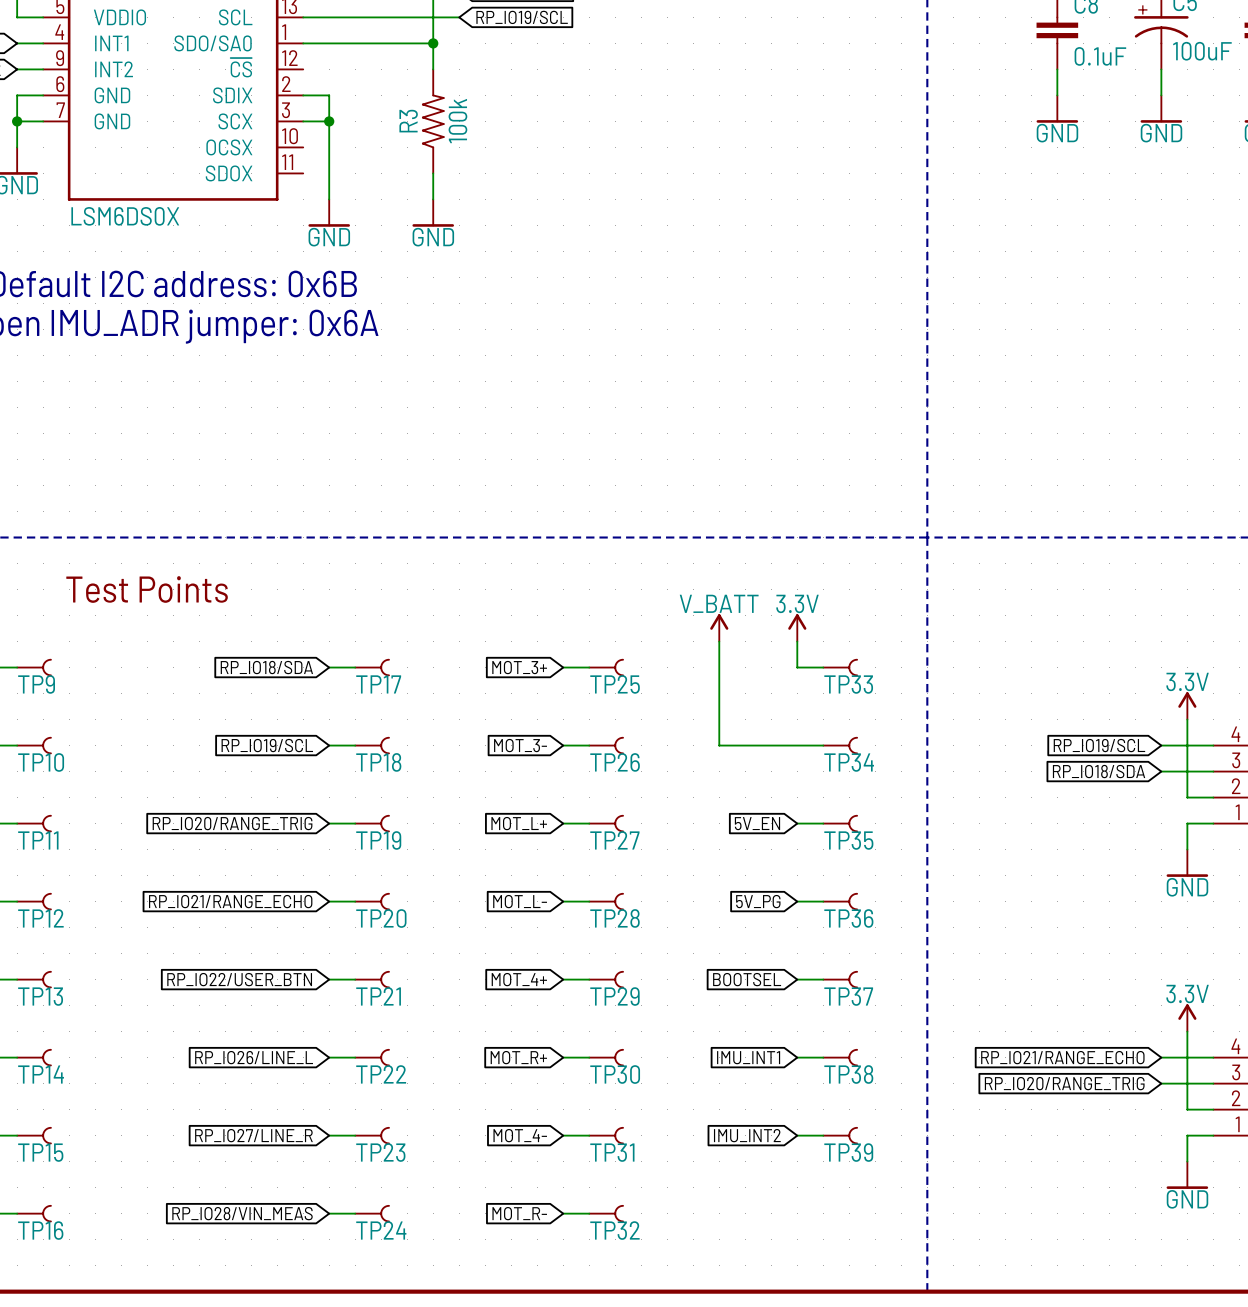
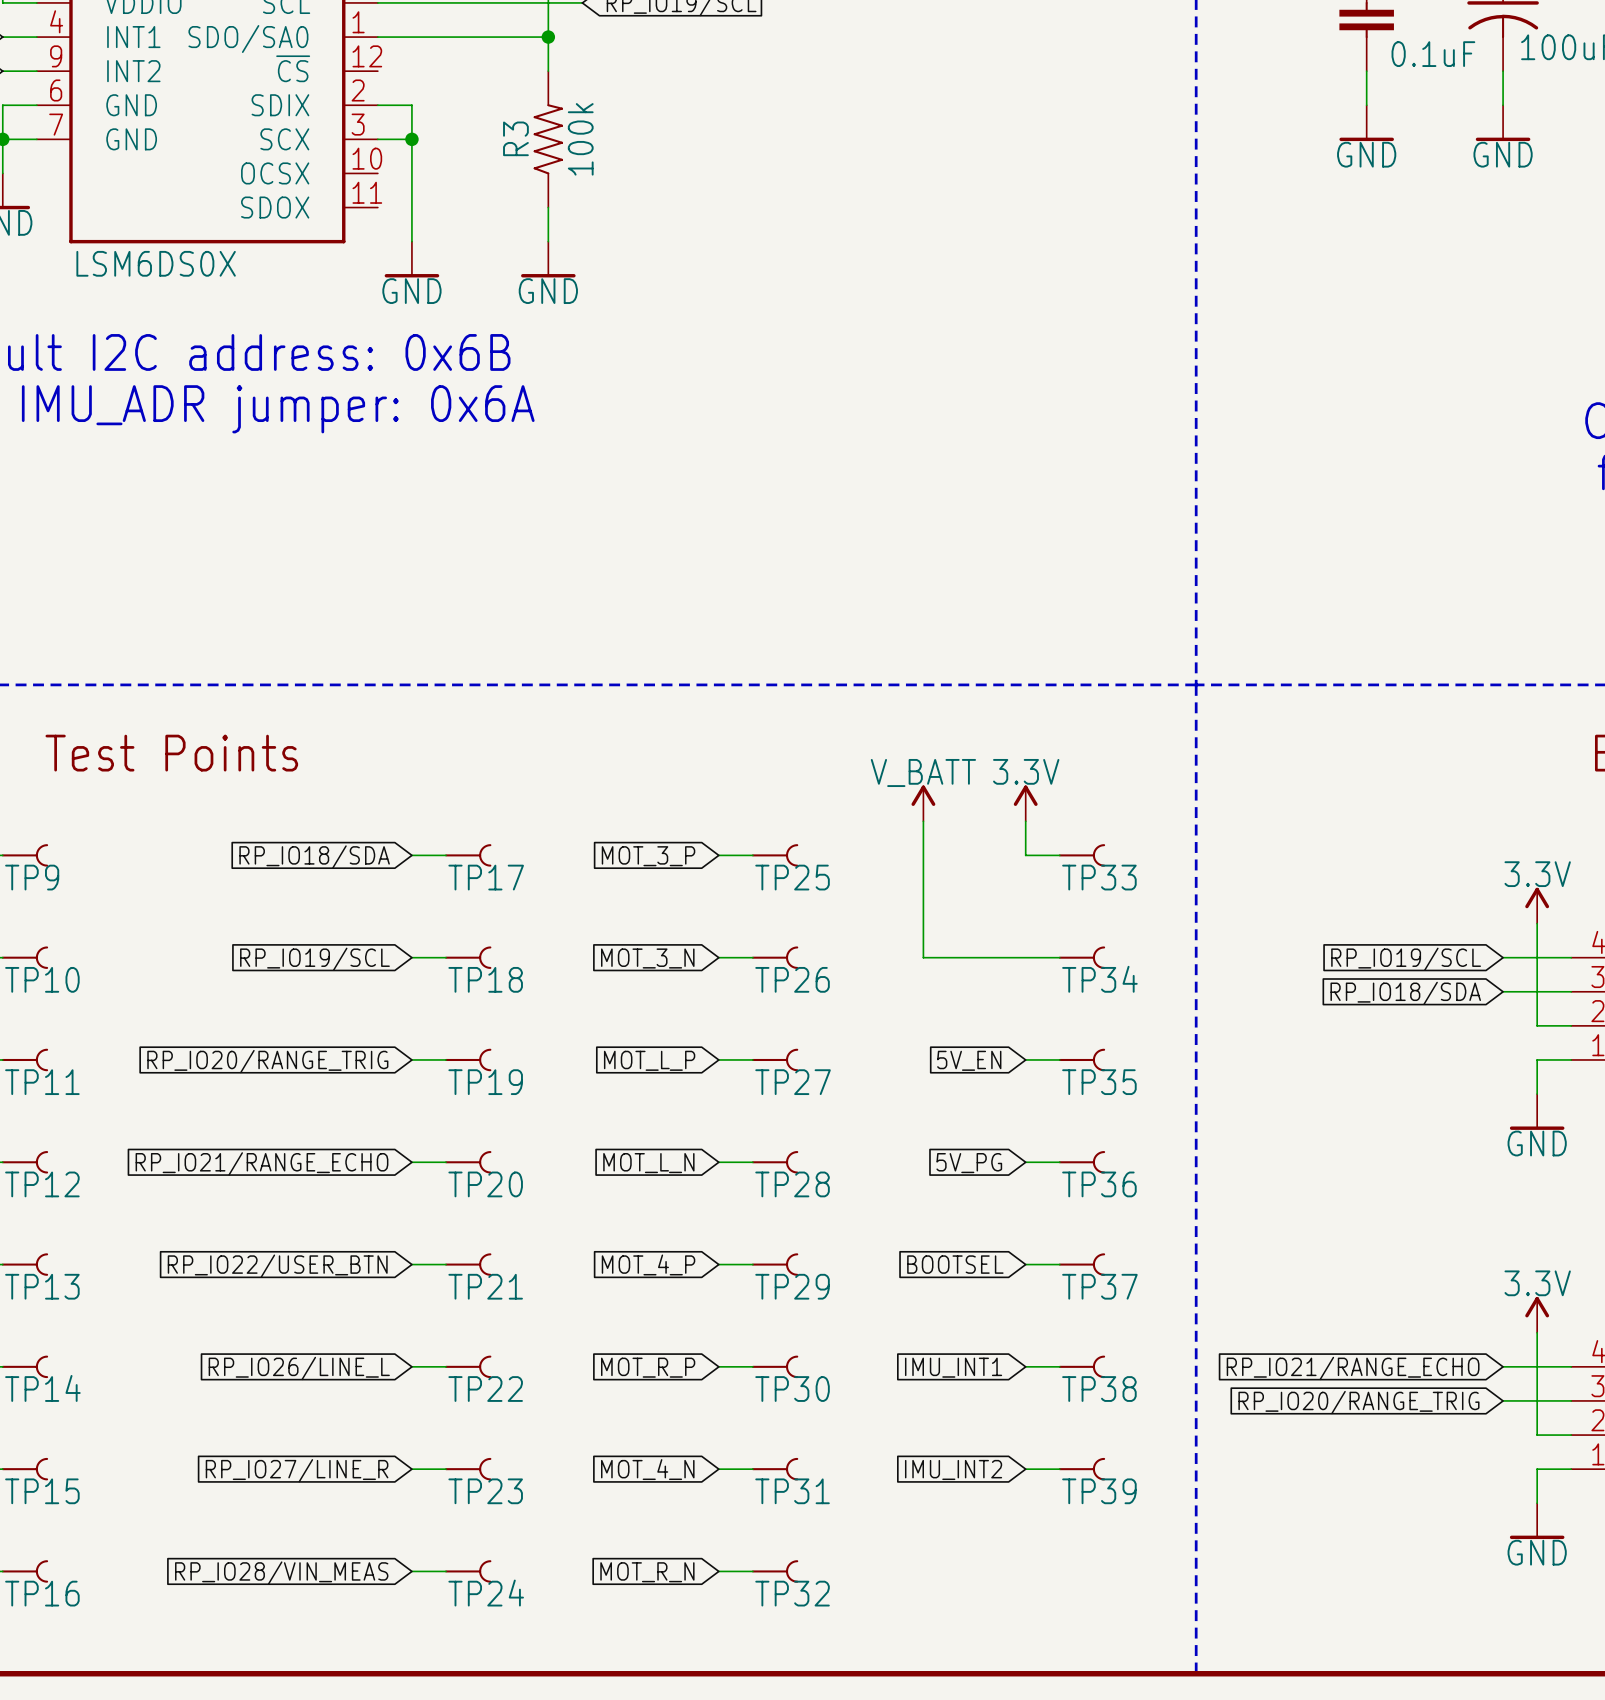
global label: MOT_3+ (519, 667) -> MOT_3_P (648, 856)
global label: MOT_3- (520, 745) -> MOT_3_N (647, 958)
global label: MOT_L+ (519, 823) -> MOT_L_P (649, 1060)
global label: MOT_L- (520, 901) -> MOT_L_N (648, 1163)
global label: MOT_4+ (519, 979) -> MOT_4_P (648, 1264)
global label: MOT_R+ (518, 1057) -> MOT_R_P (648, 1367)
global label: MOT_4- (520, 1135) -> MOT_4_N (647, 1469)
global label: MOT_R- (519, 1213) -> MOT_R_N (647, 1572)

